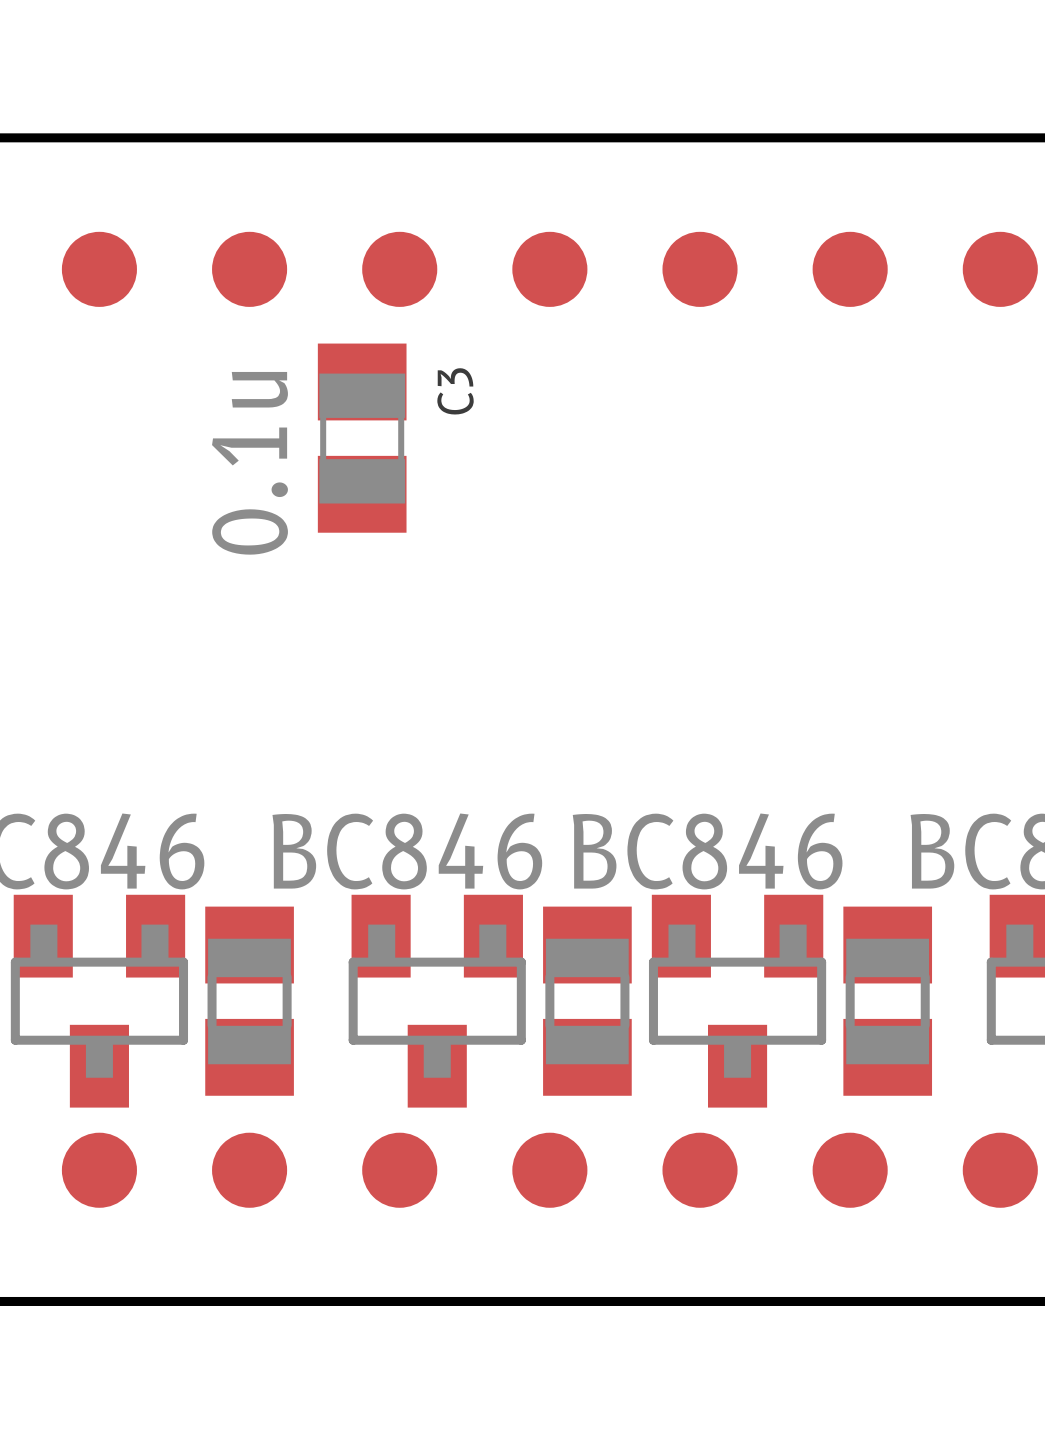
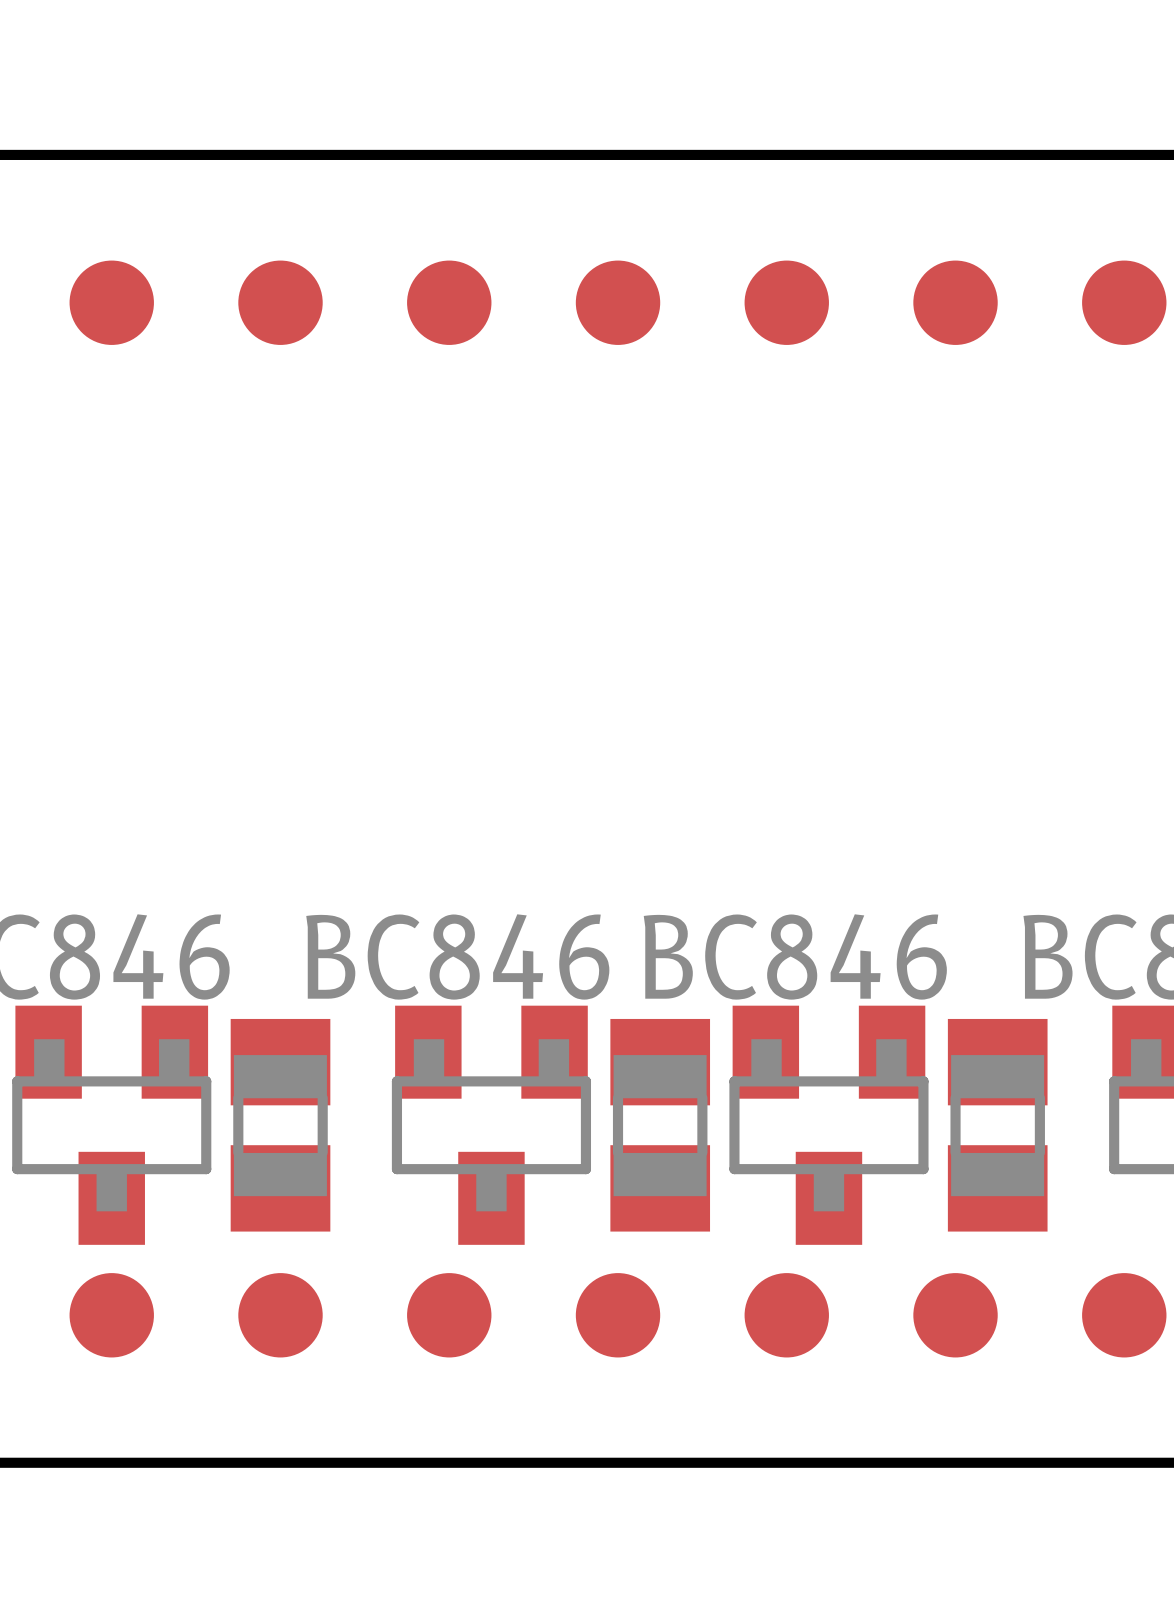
C3: 0.1u (362, 438) -> none

